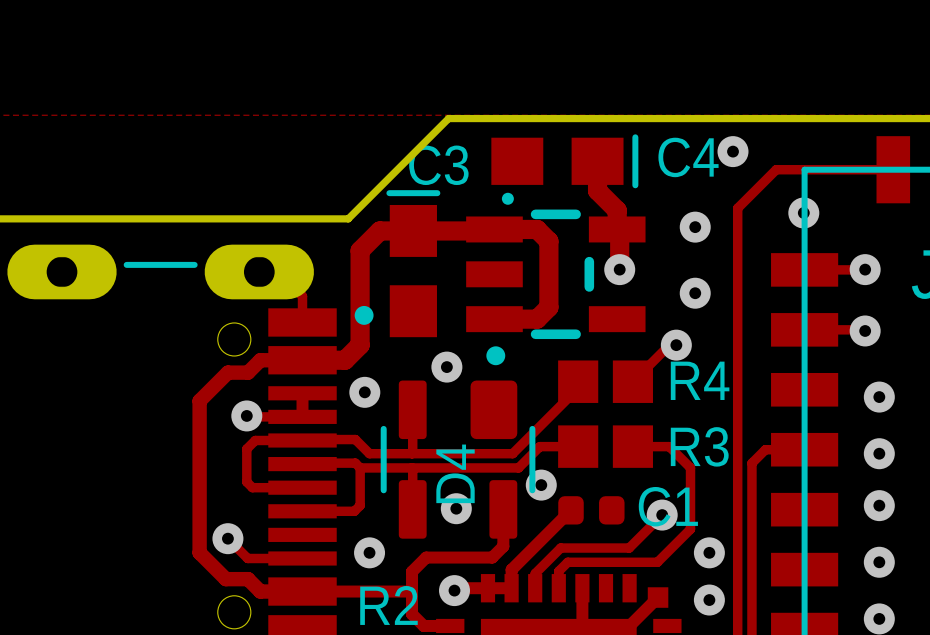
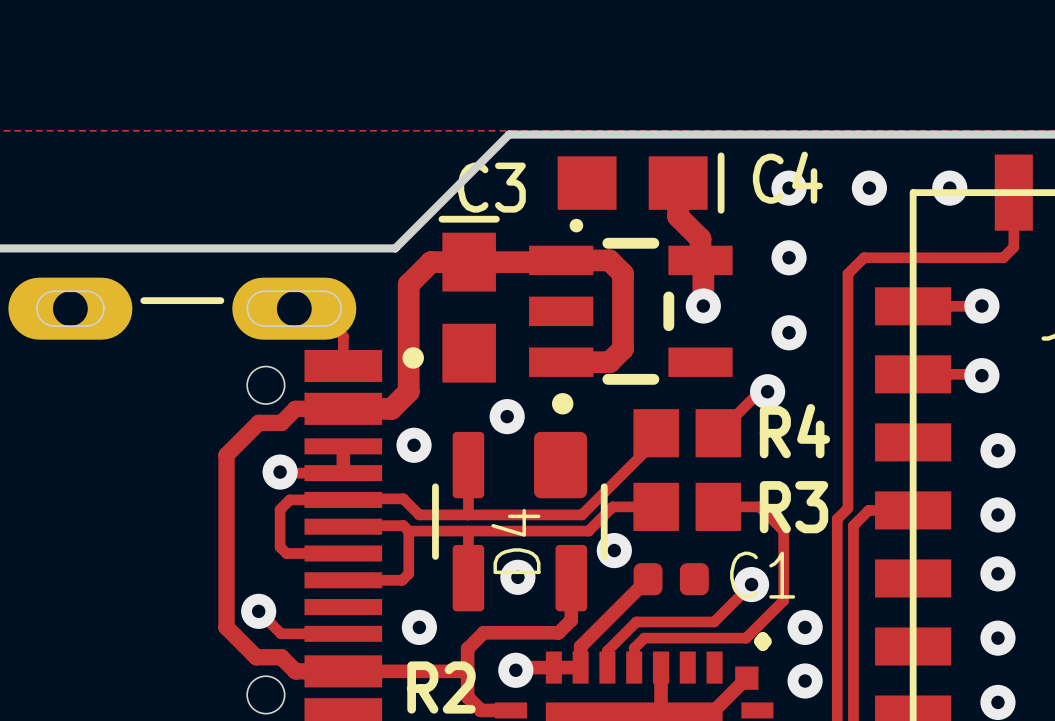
via: (733, 151) -> none
via: none -> (789, 188)
via: none -> (869, 188)
via: none -> (949, 188)
track: (893, 169) (776, 169) (737, 208) (737, 457) -> (1013, 192) (1013, 247) (1003, 257) (864, 257) (847, 273) (847, 508) (837, 519)
via: (803, 212) -> none
text: none -> . (762, 641)

